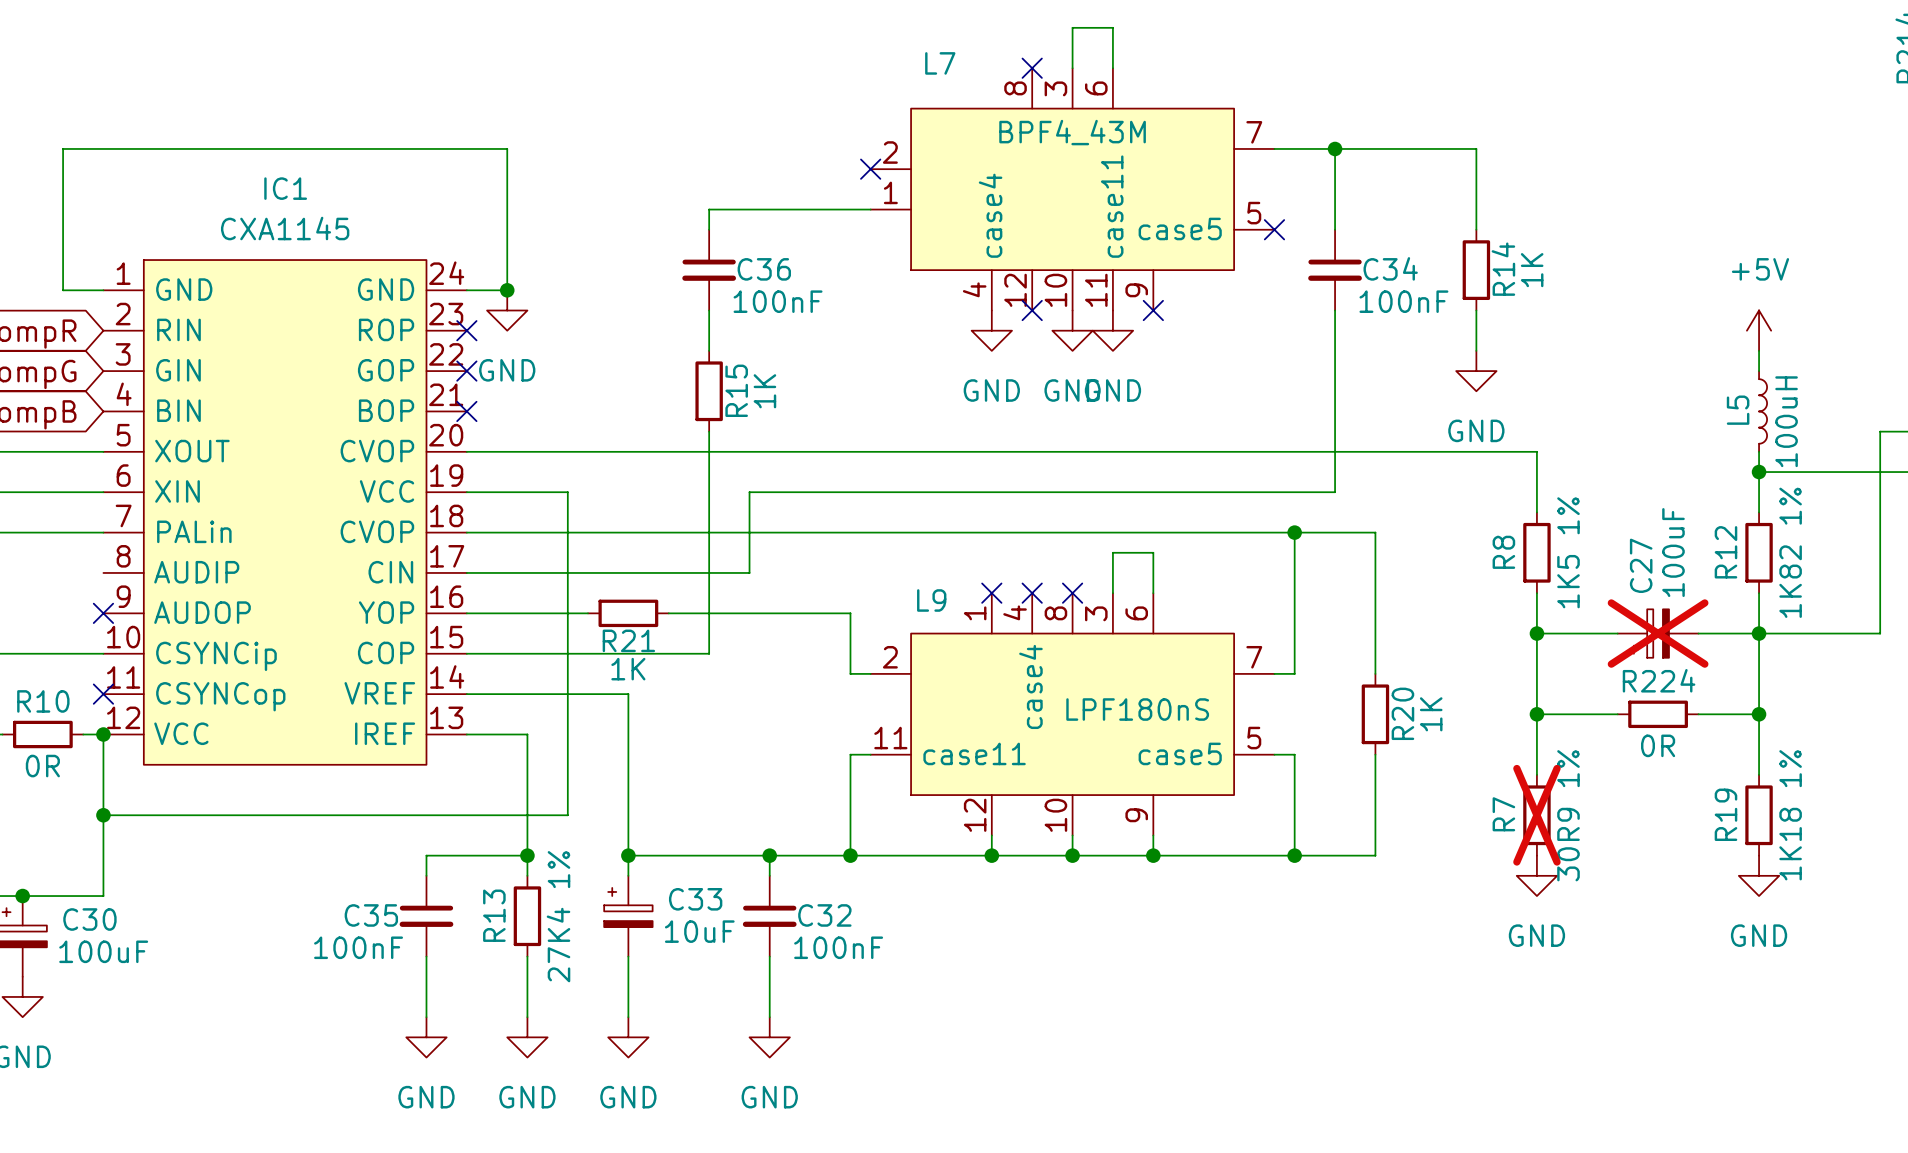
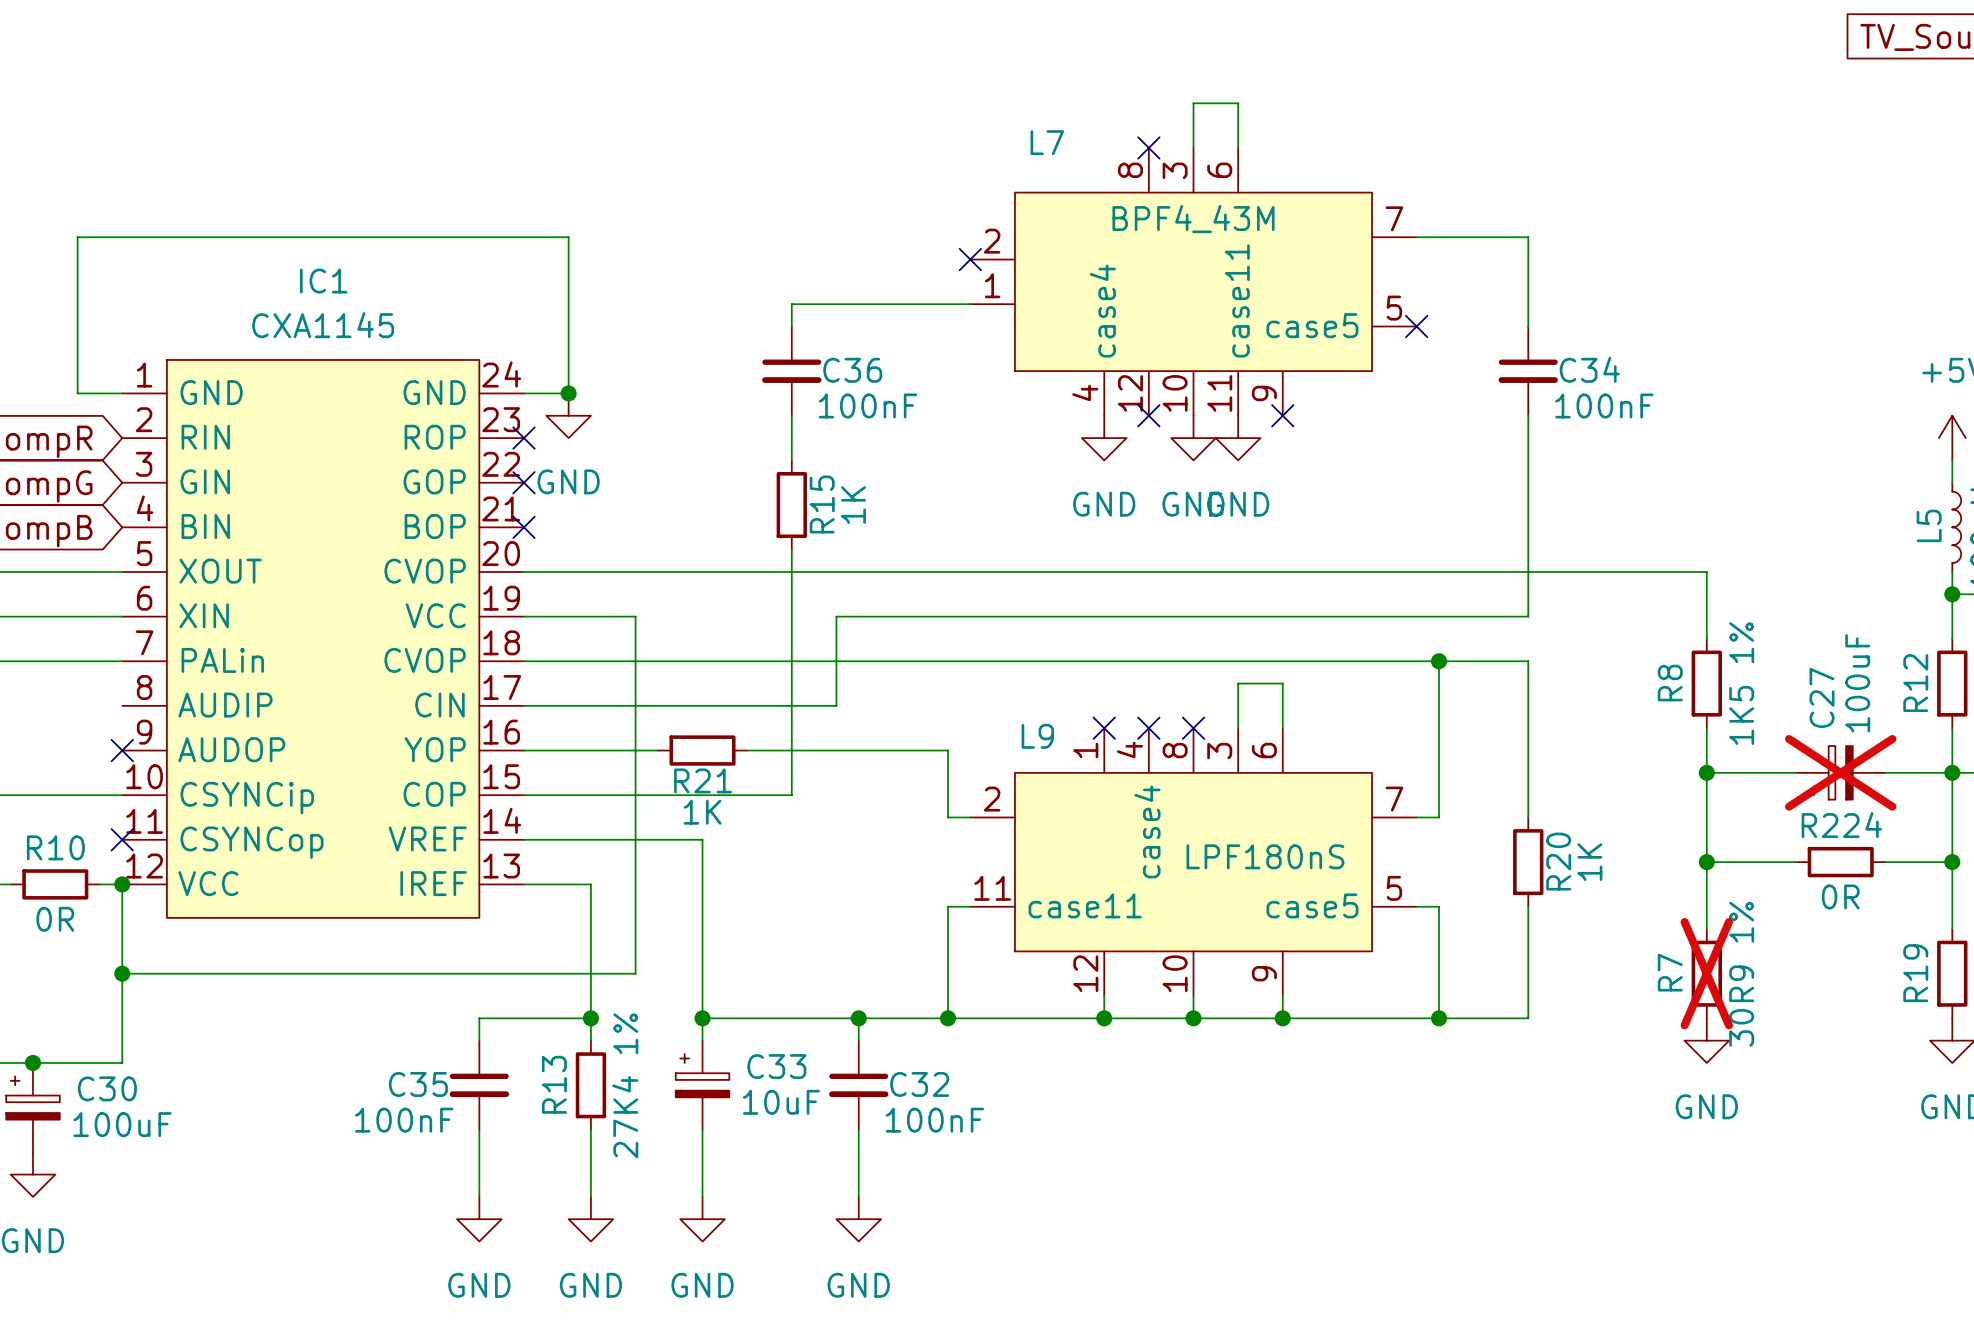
wire: (1335, 148) (1335, 229) -> none
junction: (1335, 148) -> none
wire: (1375, 148) (1476, 148) (1476, 229) -> (1528, 237) (1528, 326)
C34 position: (1335, 270) -> (1528, 371)
R14: 1K (1476, 270) -> none
wire: (1335, 310) (1335, 492) -> (1528, 415) (1528, 616) (1483, 616)
wire: (1476, 310) (1476, 350) -> none
power symbol: GND (1476, 371) -> none

